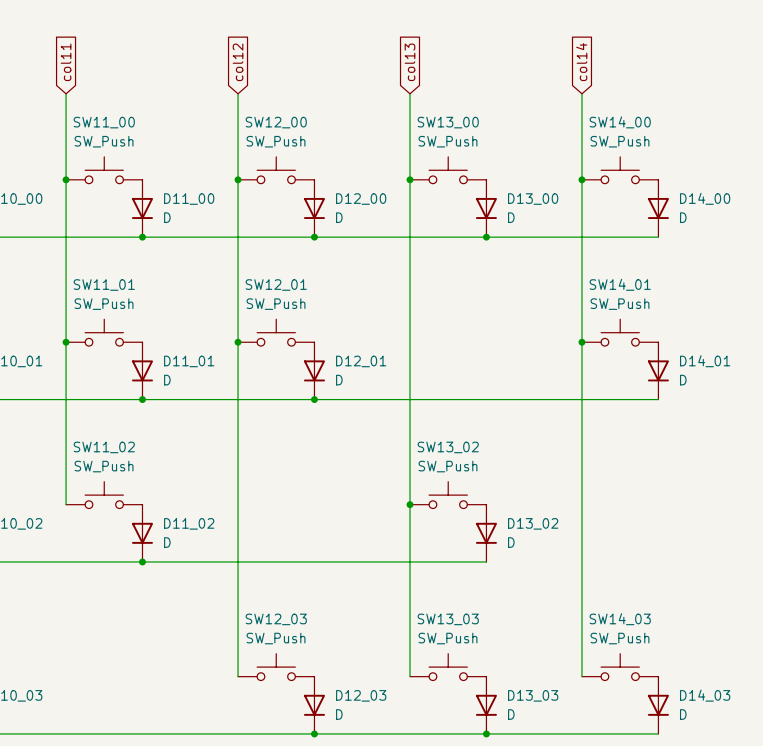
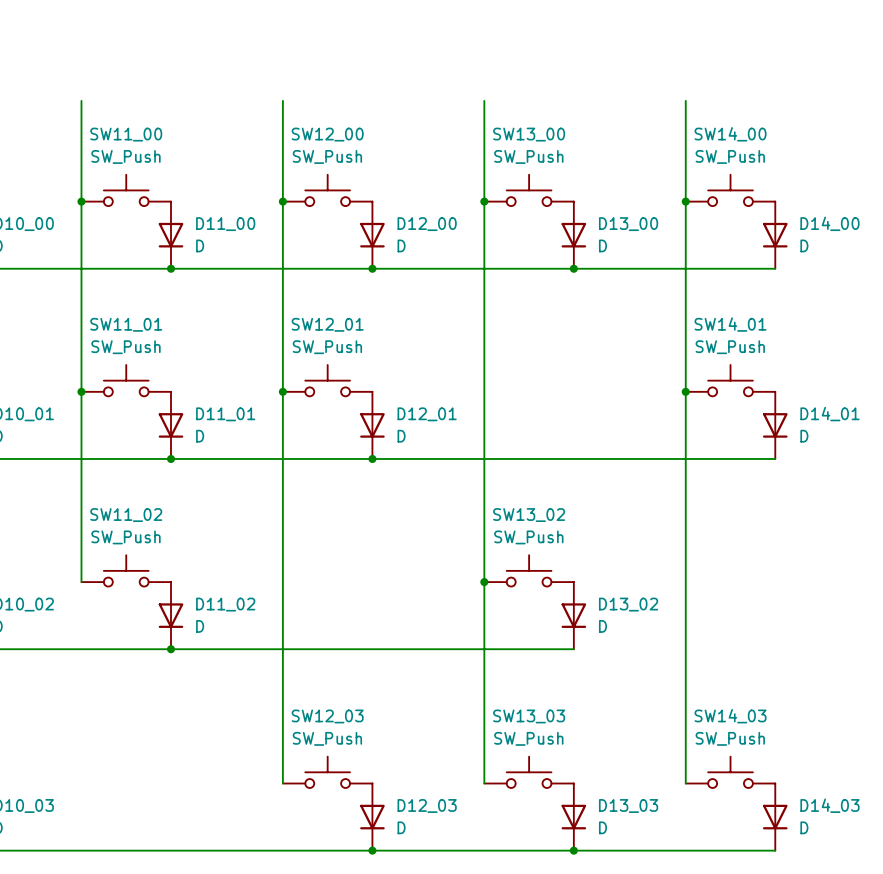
global label: col11 (66, 62) -> none
global label: col12 (238, 62) -> none
global label: col13 (410, 62) -> none
global label: col14 (581, 62) -> none

